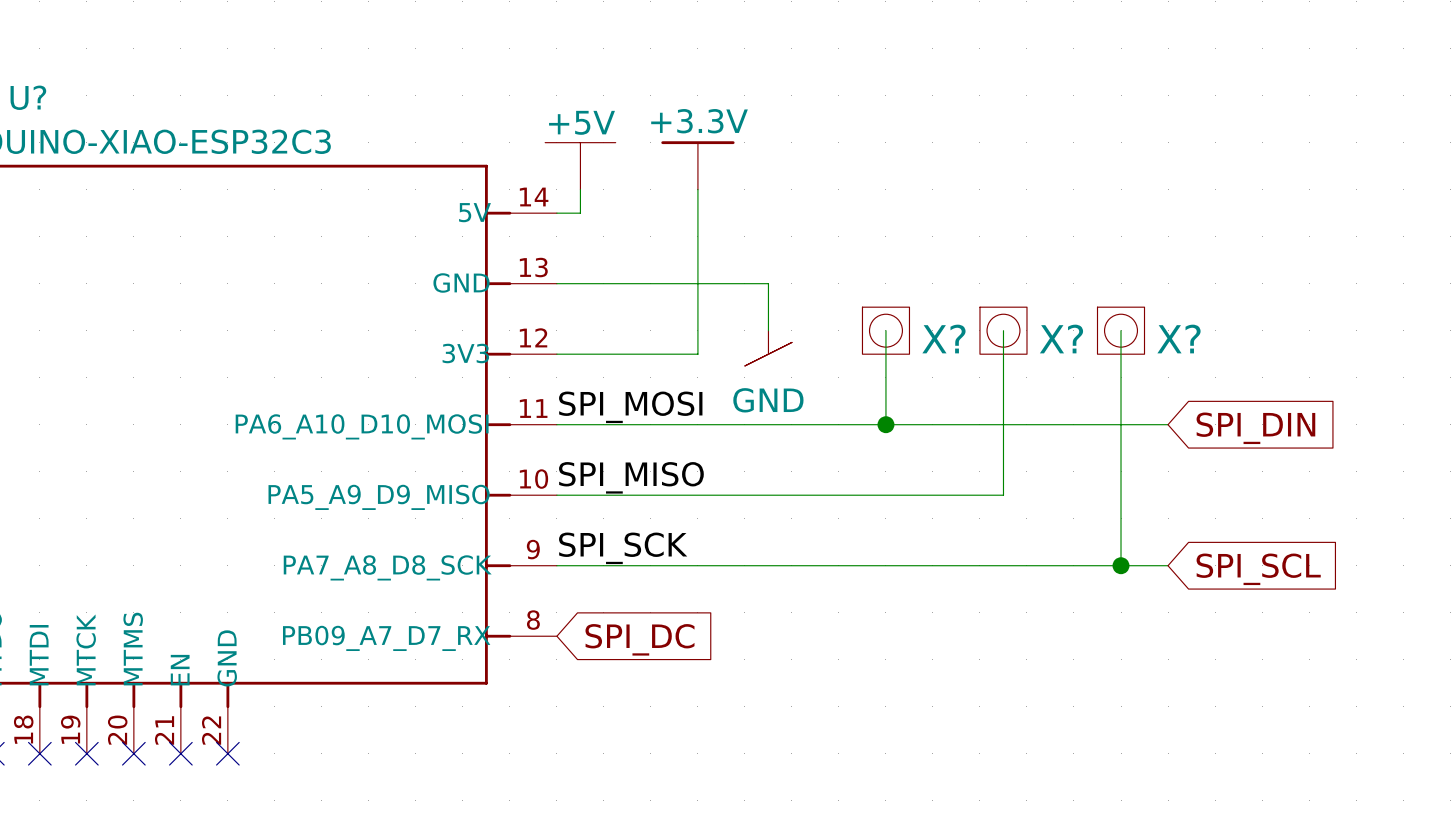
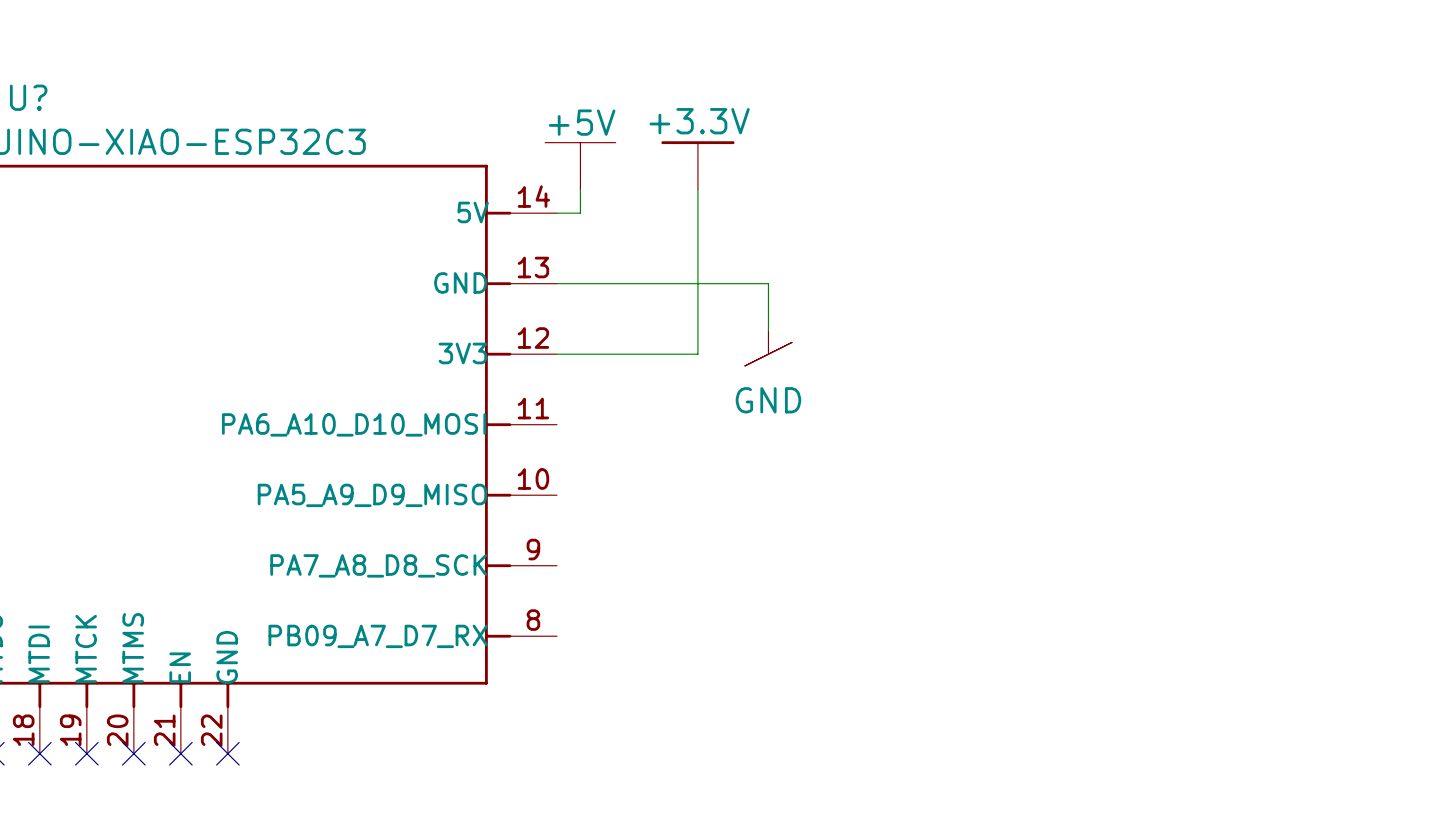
wire: (885, 330) (885, 424) -> none
X?: (885, 330) -> none
wire: (1003, 330) (1003, 495) (556, 495) -> none
X?: (1003, 330) -> none
wire: (1121, 330) (1121, 565) -> none
X?: (1121, 330) -> none
label: SPI_MOSI (630, 407) -> none
wire: (556, 424) (1168, 424) -> none
junction: (885, 424) -> none
global label: SPI_DIN (1255, 428) -> none
label: SPI_MISO (631, 477) -> none
label: SPI_SCK (623, 548) -> none
wire: (556, 565) (1168, 565) -> none
junction: (1121, 565) -> none
global label: SPI_SCL (1258, 569) -> none
global label: SPI_DC (639, 639) -> none

